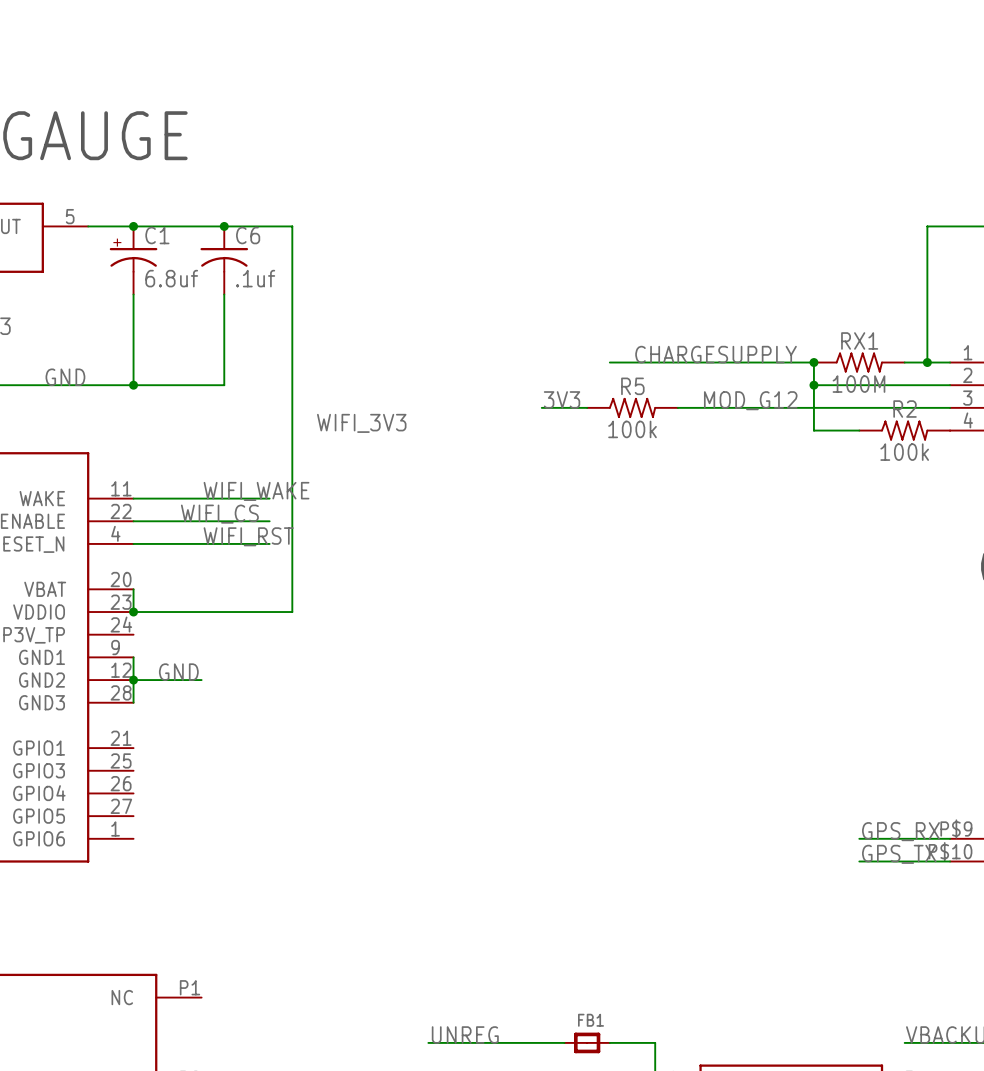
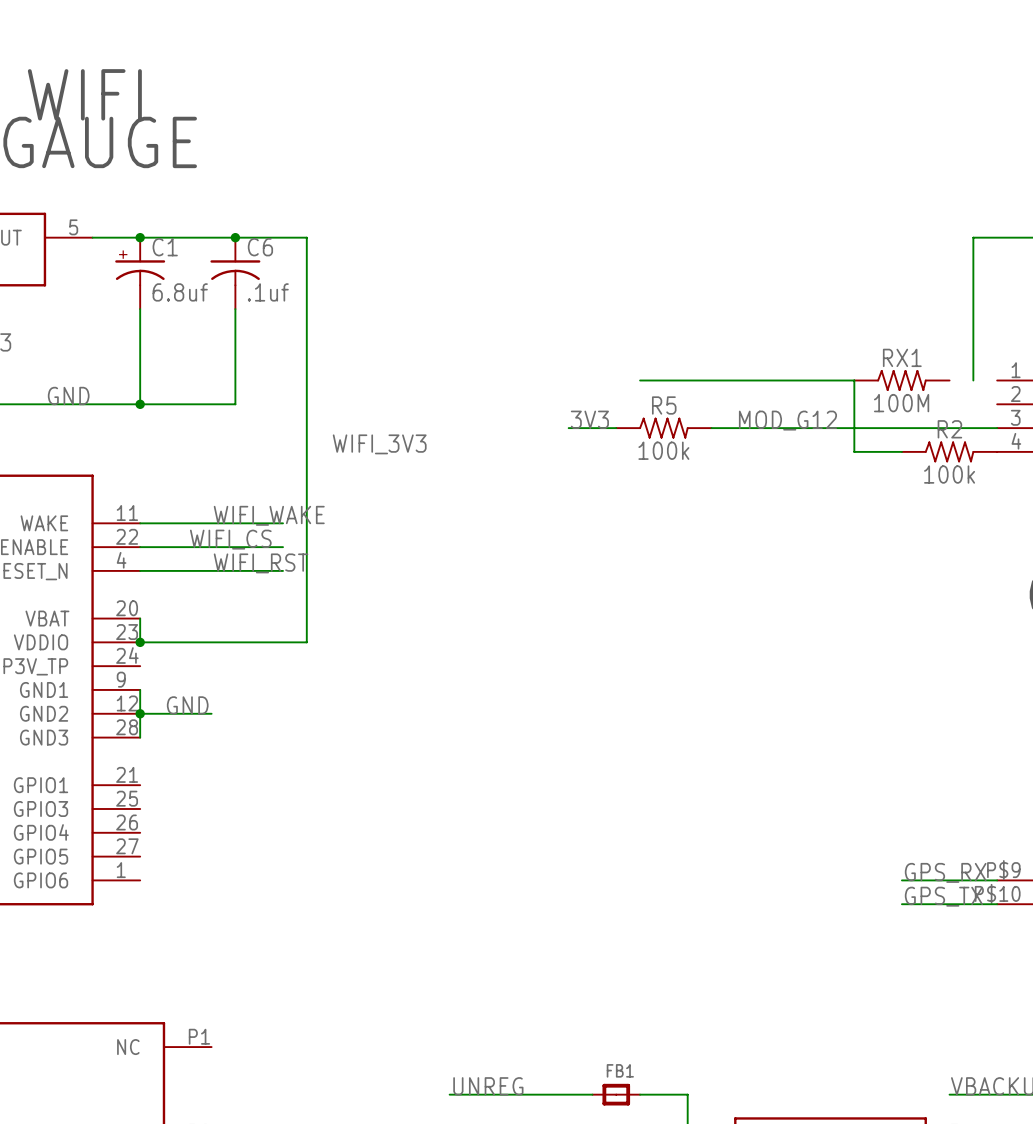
text: none -> WIFI (84, 94)
label: CHARGESUPPLY (716, 354) -> none
junction: (813, 362) -> none
wire: (904, 362) (950, 362) -> none
junction: (927, 362) -> none
wire: (813, 385) (950, 385) -> none
junction: (813, 385) -> none

